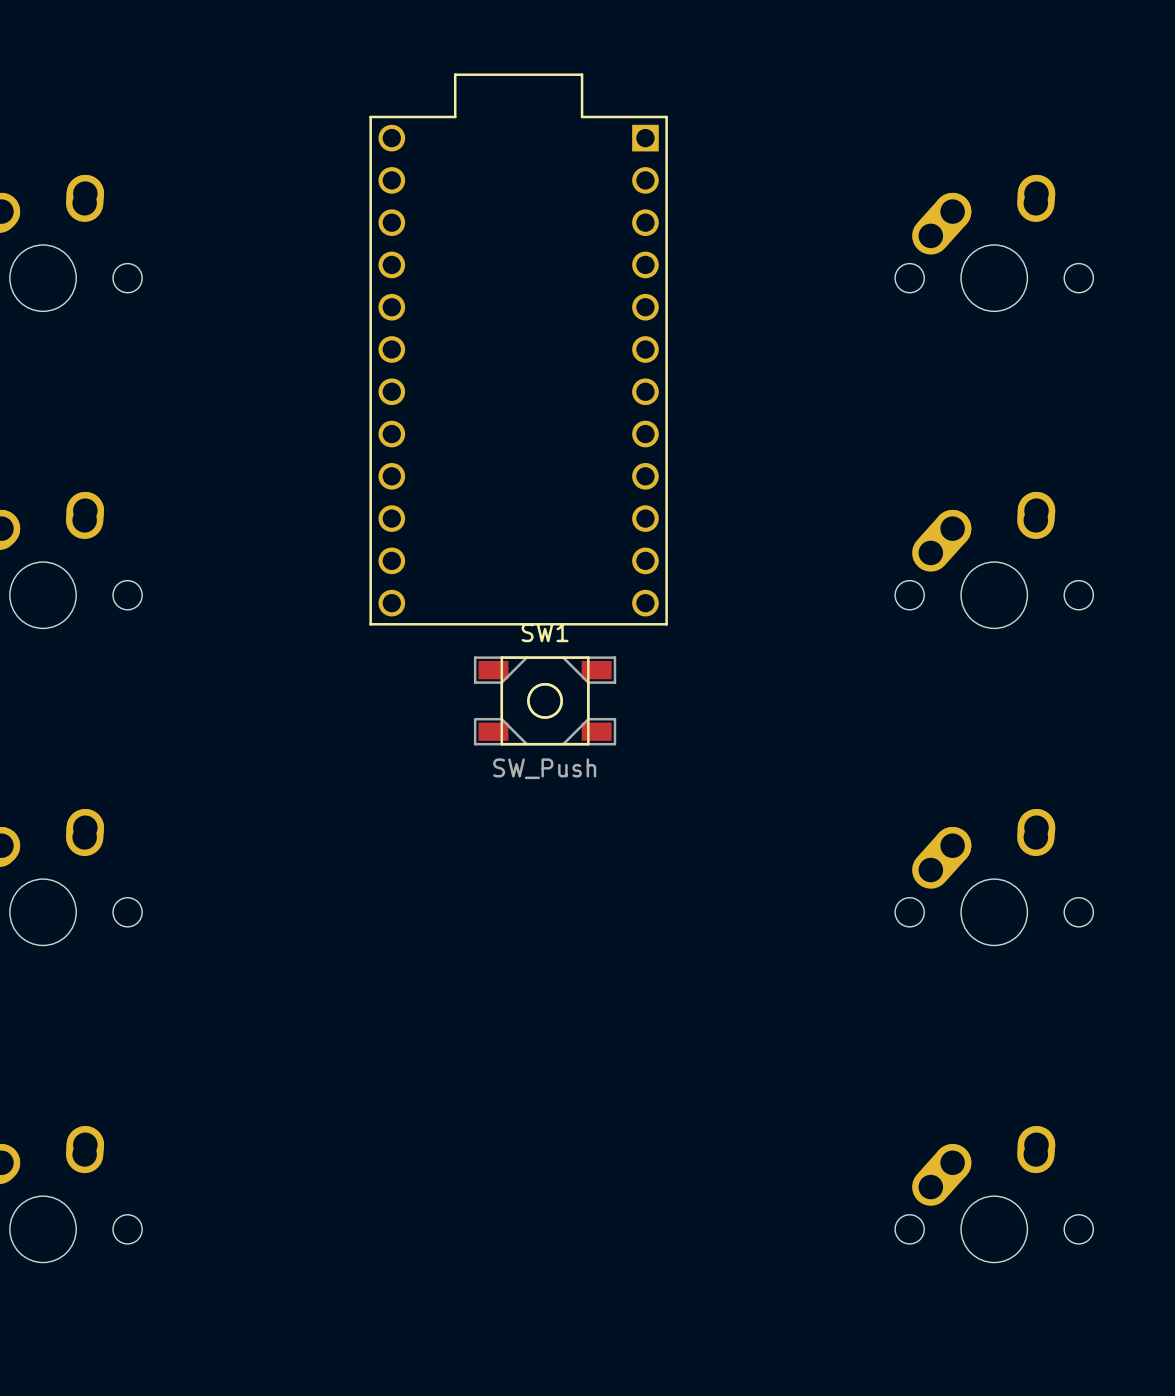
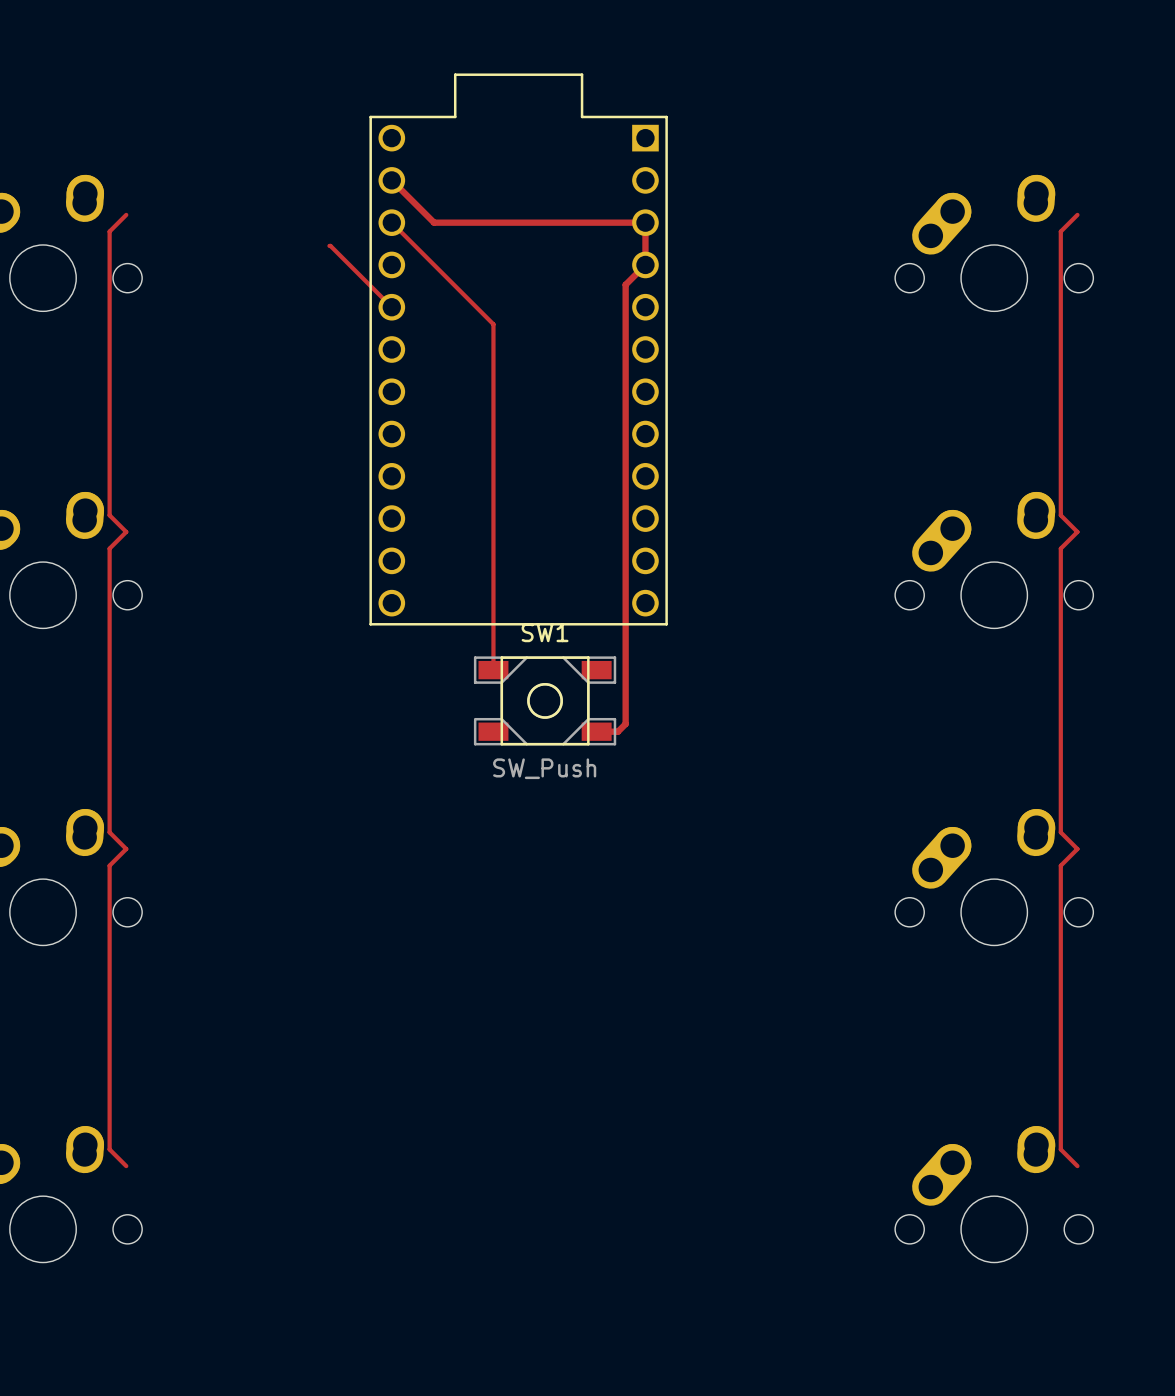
track: none -> (391, 180) (434, 222) (645, 222) (645, 264) (625, 284) (625, 724) (617, 731) (596, 731)
track: none -> (126, 214) (109, 231) (109, 515) (126, 531) (109, 548) (109, 832) (126, 849) (109, 865) (109, 1149) (126, 1166)
track: none -> (1077, 214) (1060, 231) (1060, 515) (1077, 531) (1060, 548) (1060, 832) (1077, 849) (1060, 865) (1060, 1149) (1077, 1166)
track: none -> (391, 222) (493, 324) (493, 670)
track: none -> (329, 245) (391, 307)

